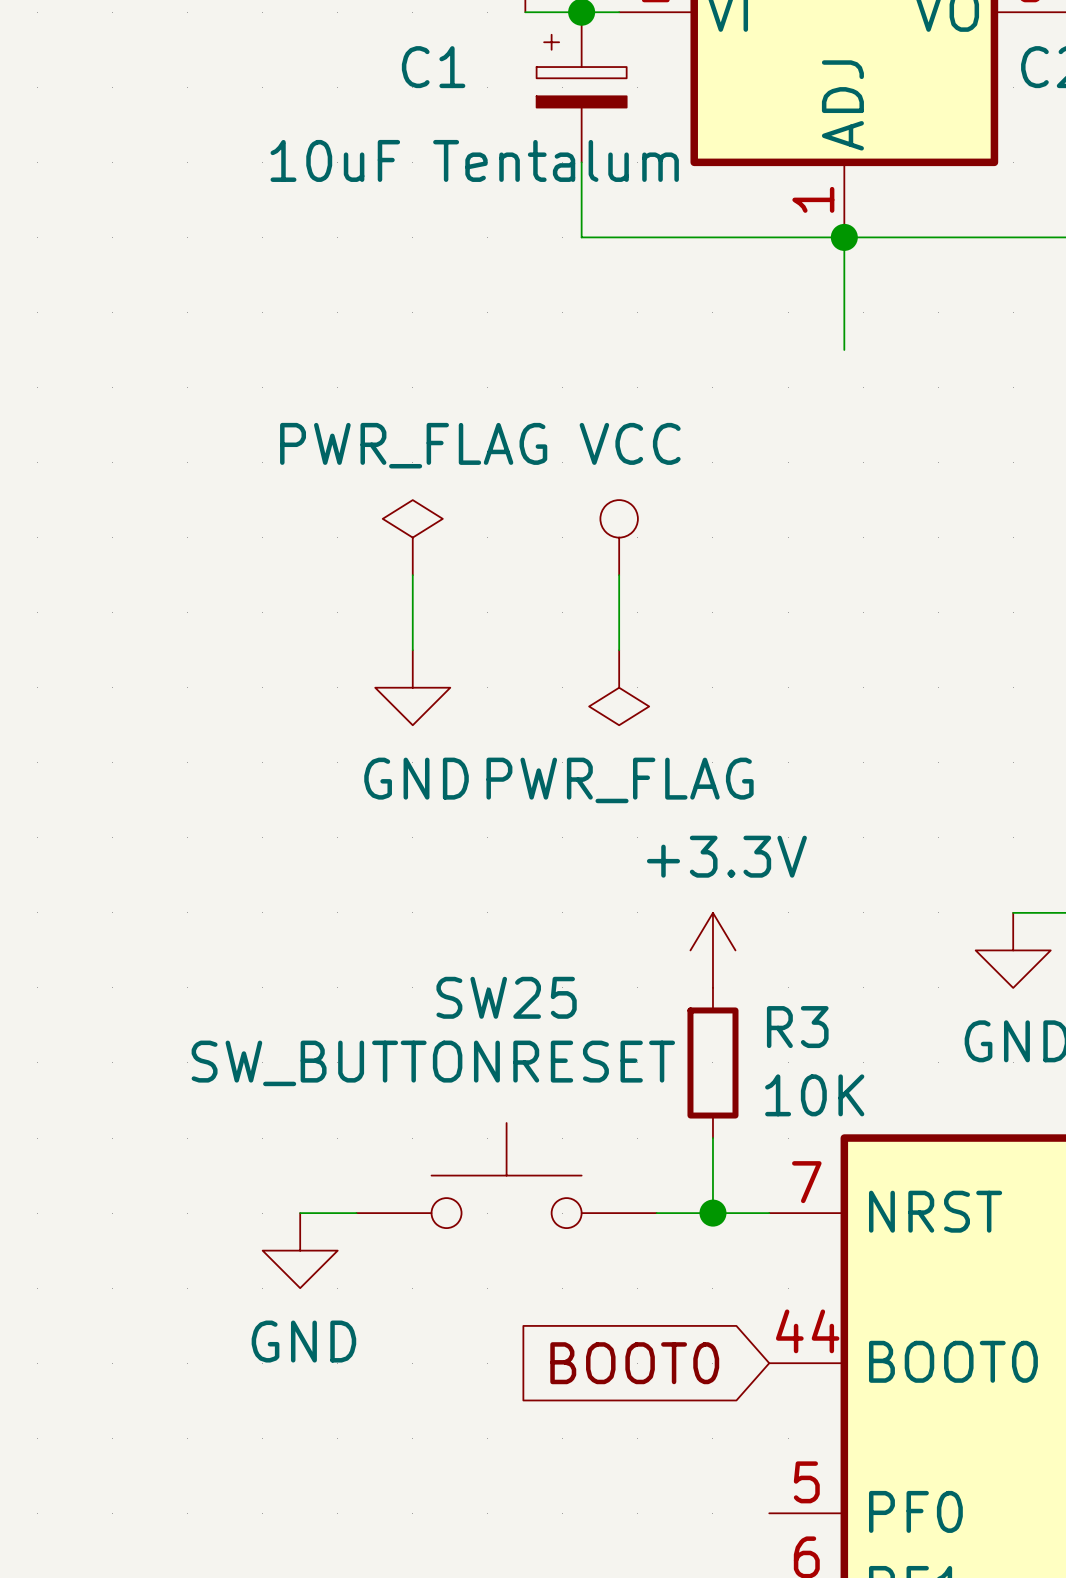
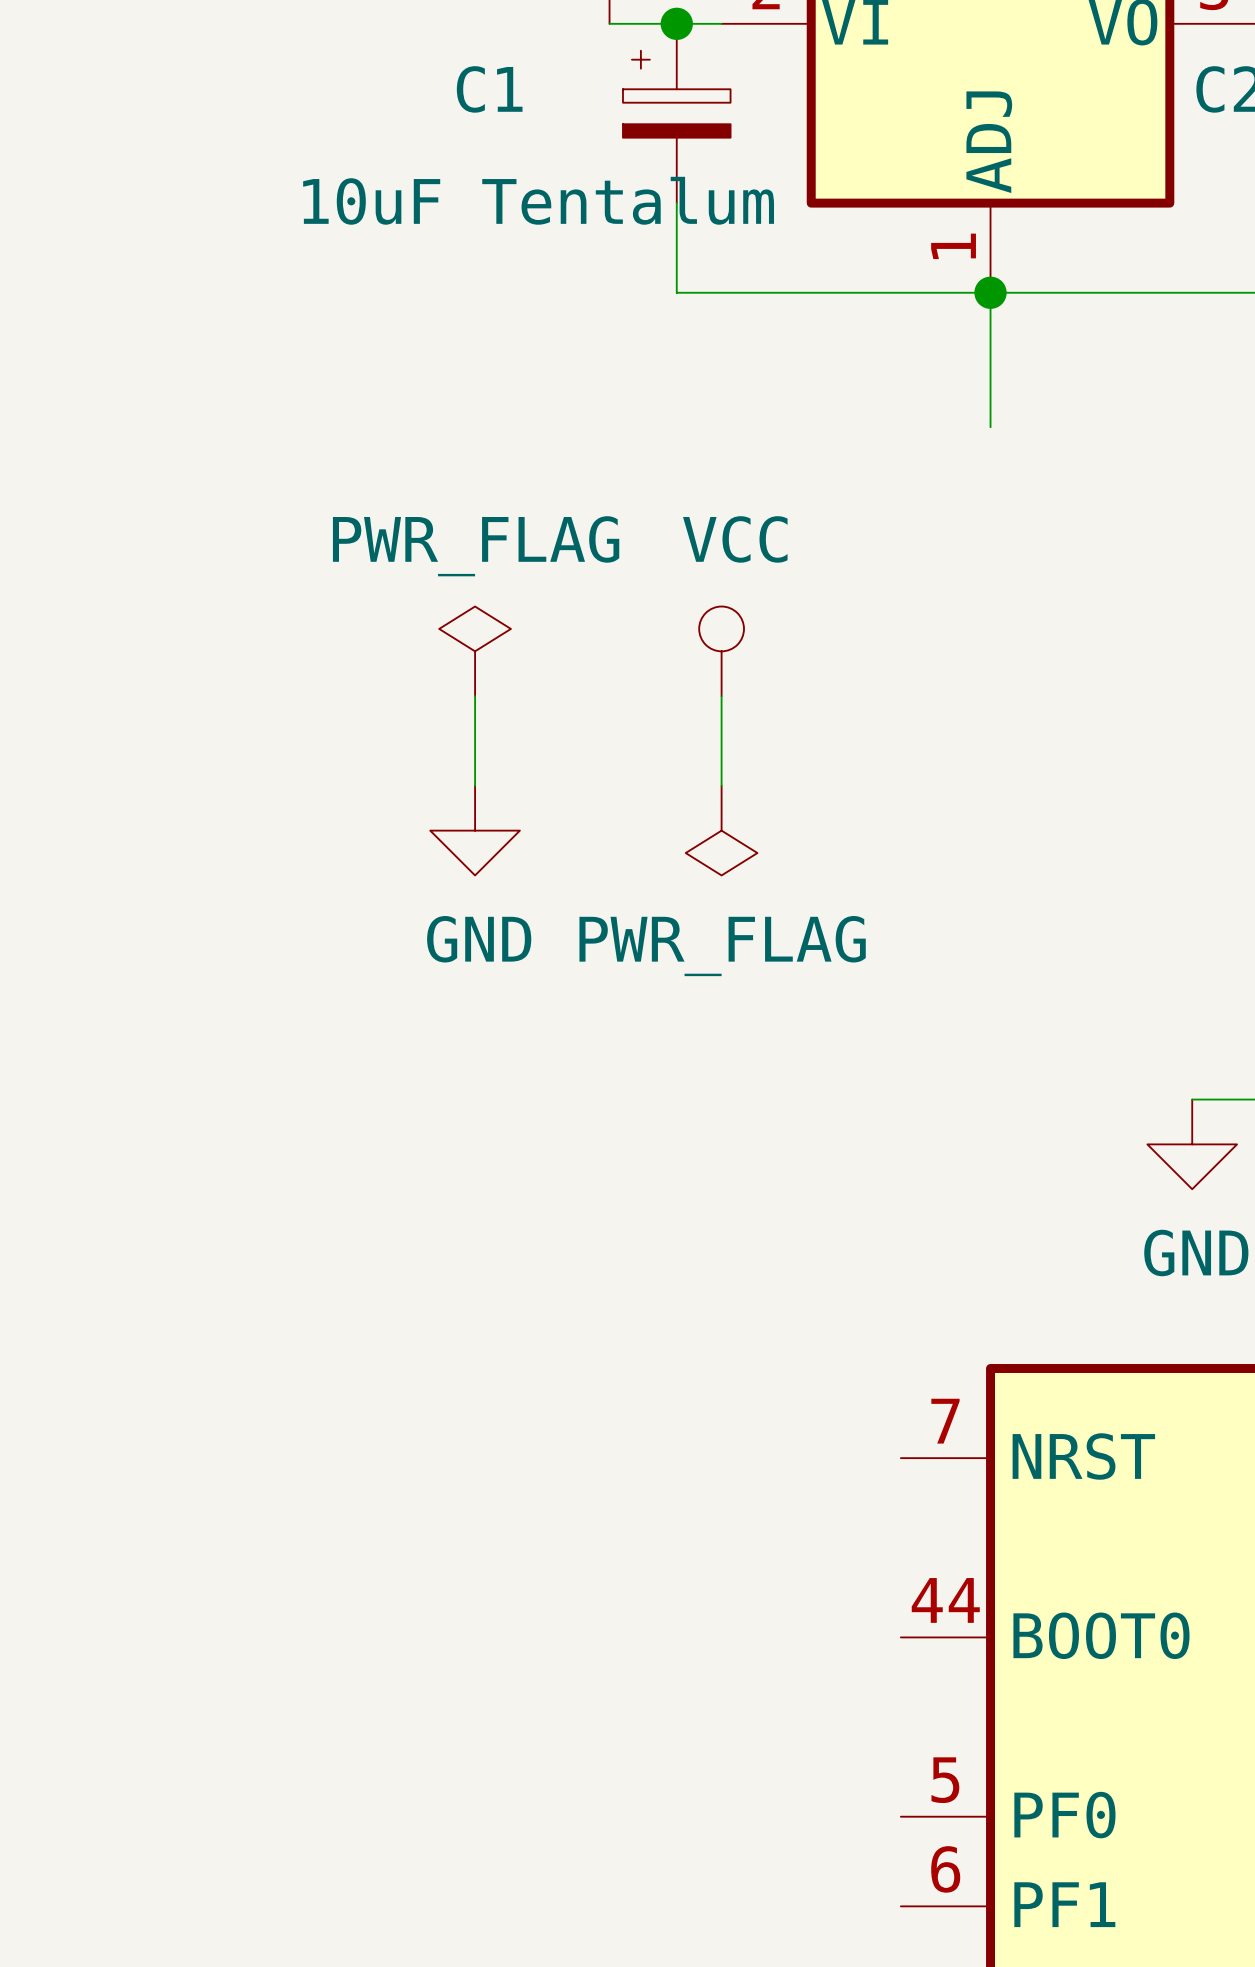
power symbol: +3.3V (712, 950) -> none
R3: 10K (712, 1062) -> none
wire: (712, 1138) (712, 1213) -> none
SW25: SW_BUTTONRESET (506, 1175) -> none
wire: (300, 1213) (356, 1213) -> none
wire: (656, 1213) (769, 1213) -> none
junction: (712, 1213) -> none
power symbol: GND (300, 1250) -> none
global label: BOOT0 (634, 1363) -> none

